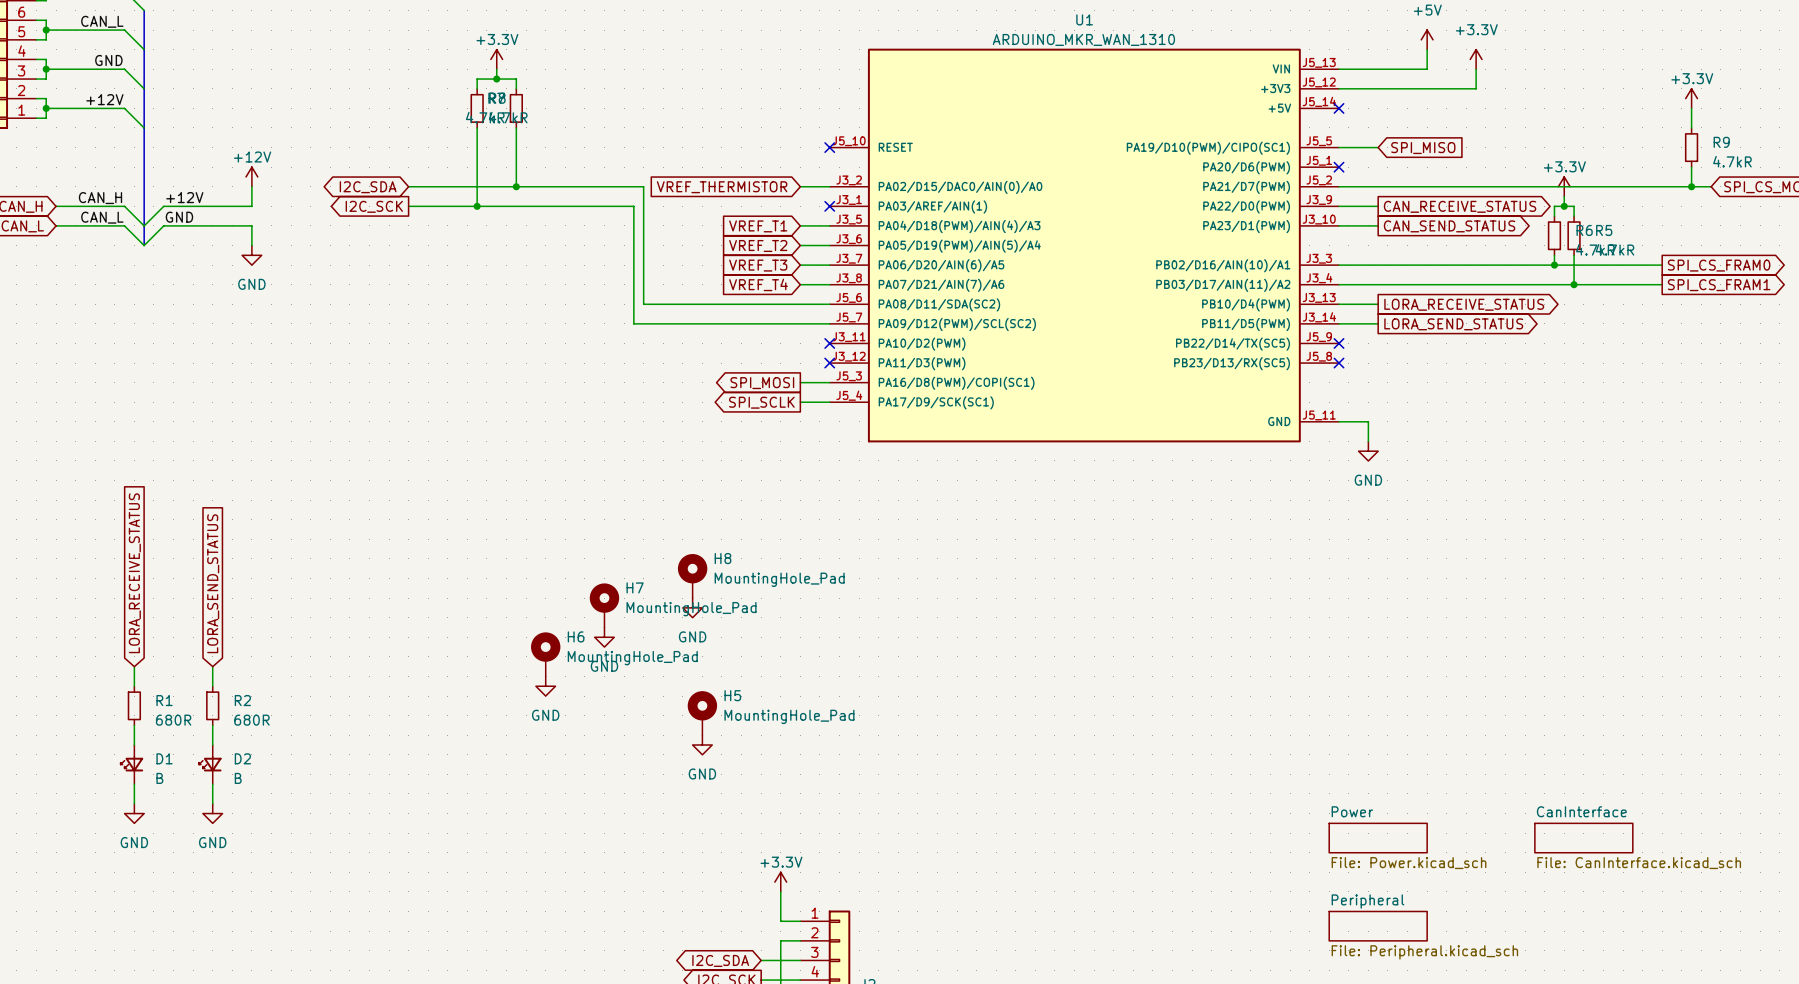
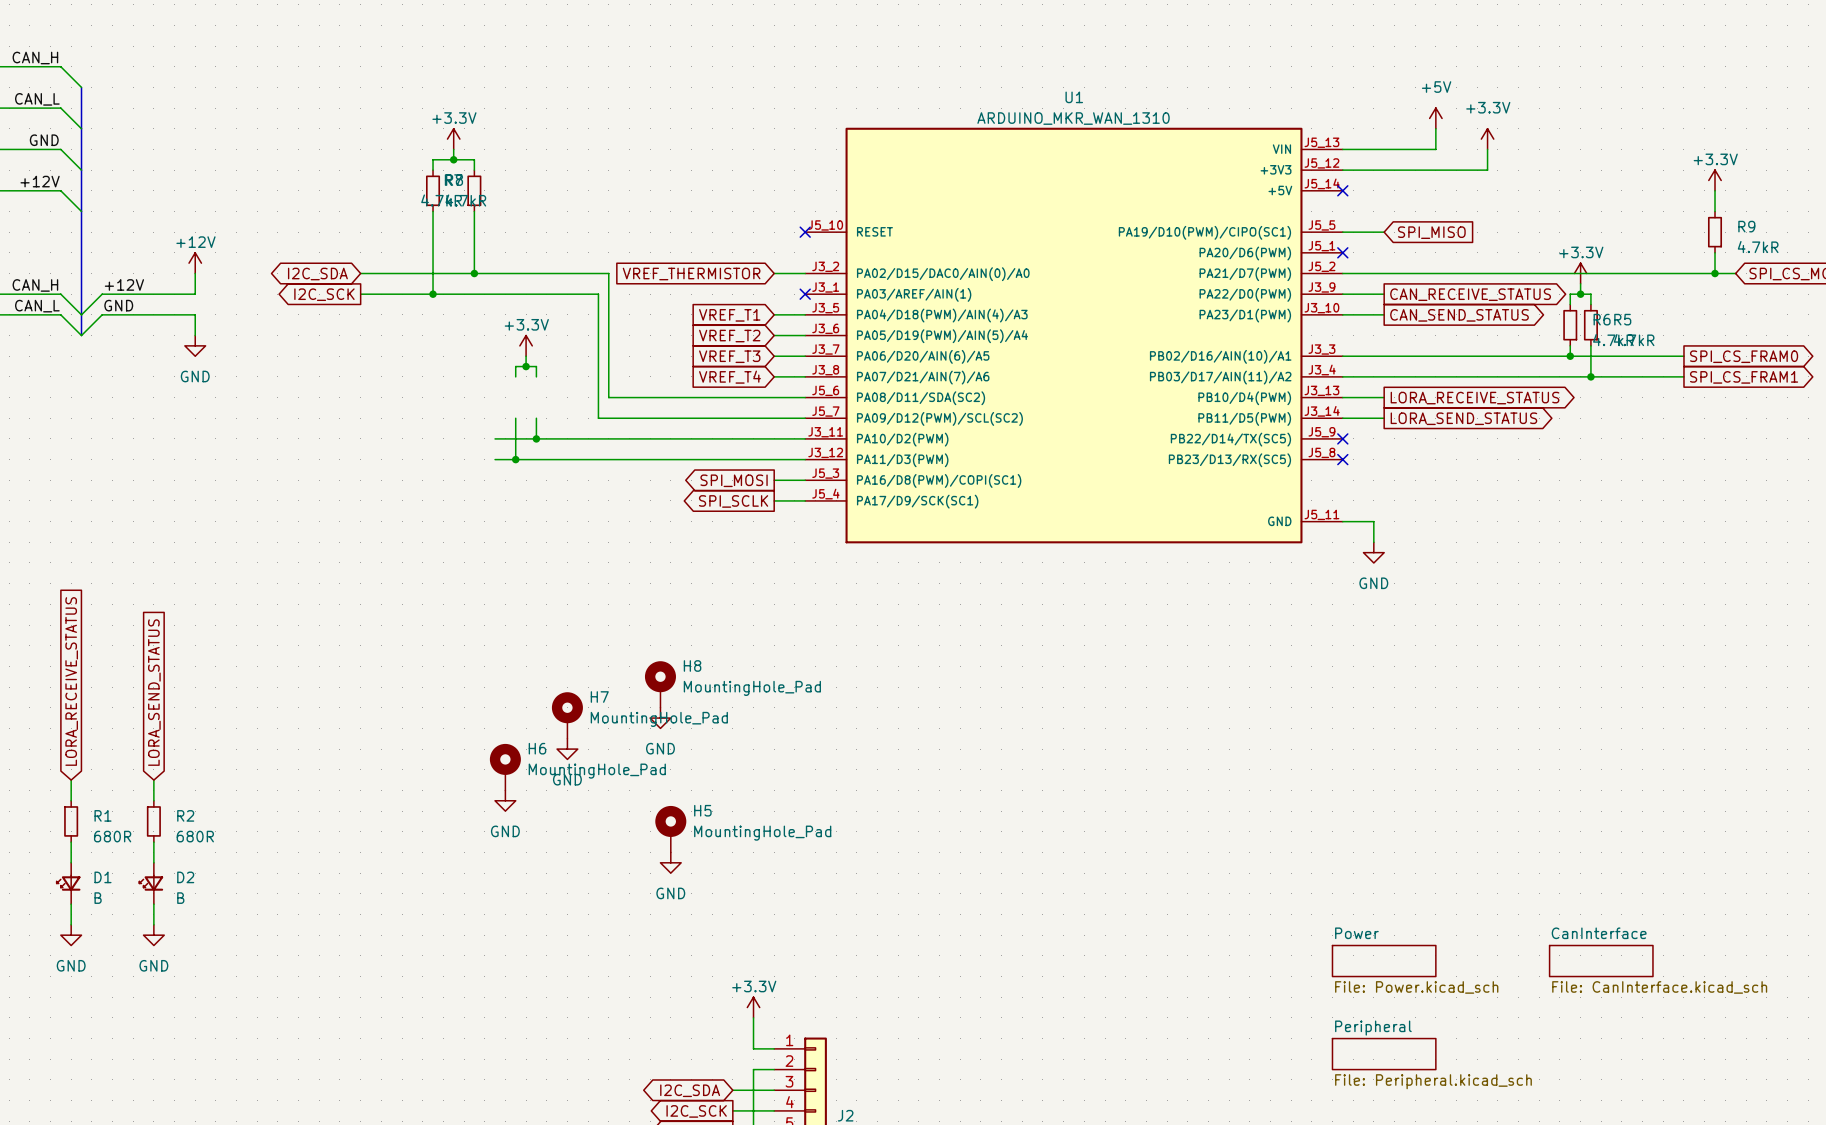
power symbol: none -> +3.3V (526, 345)
wire: none -> (526, 356) (526, 366)
junction: none -> (526, 366)
wire: none -> (515, 376) (515, 366) (536, 366) (536, 376)
wire: none -> (515, 418) (515, 459)
wire: none -> (536, 418) (536, 438)
wire: none -> (495, 438) (805, 438)
junction: none -> (536, 438)
no-connect mark: (829, 343) -> none
wire: none -> (495, 459) (805, 459)
junction: none -> (515, 459)
no-connect mark: (829, 363) -> none

